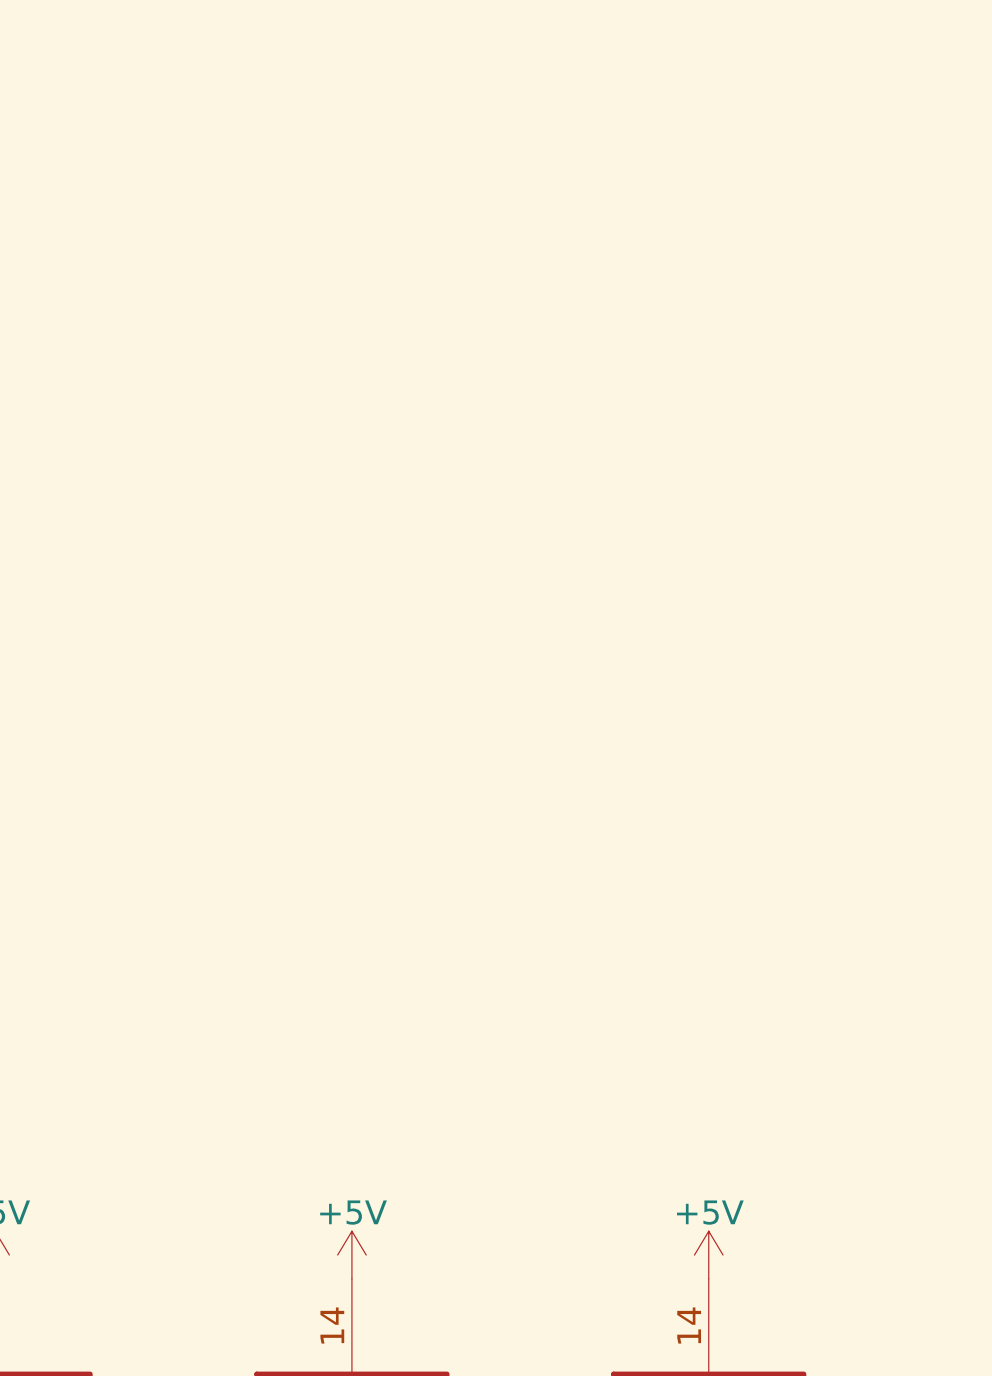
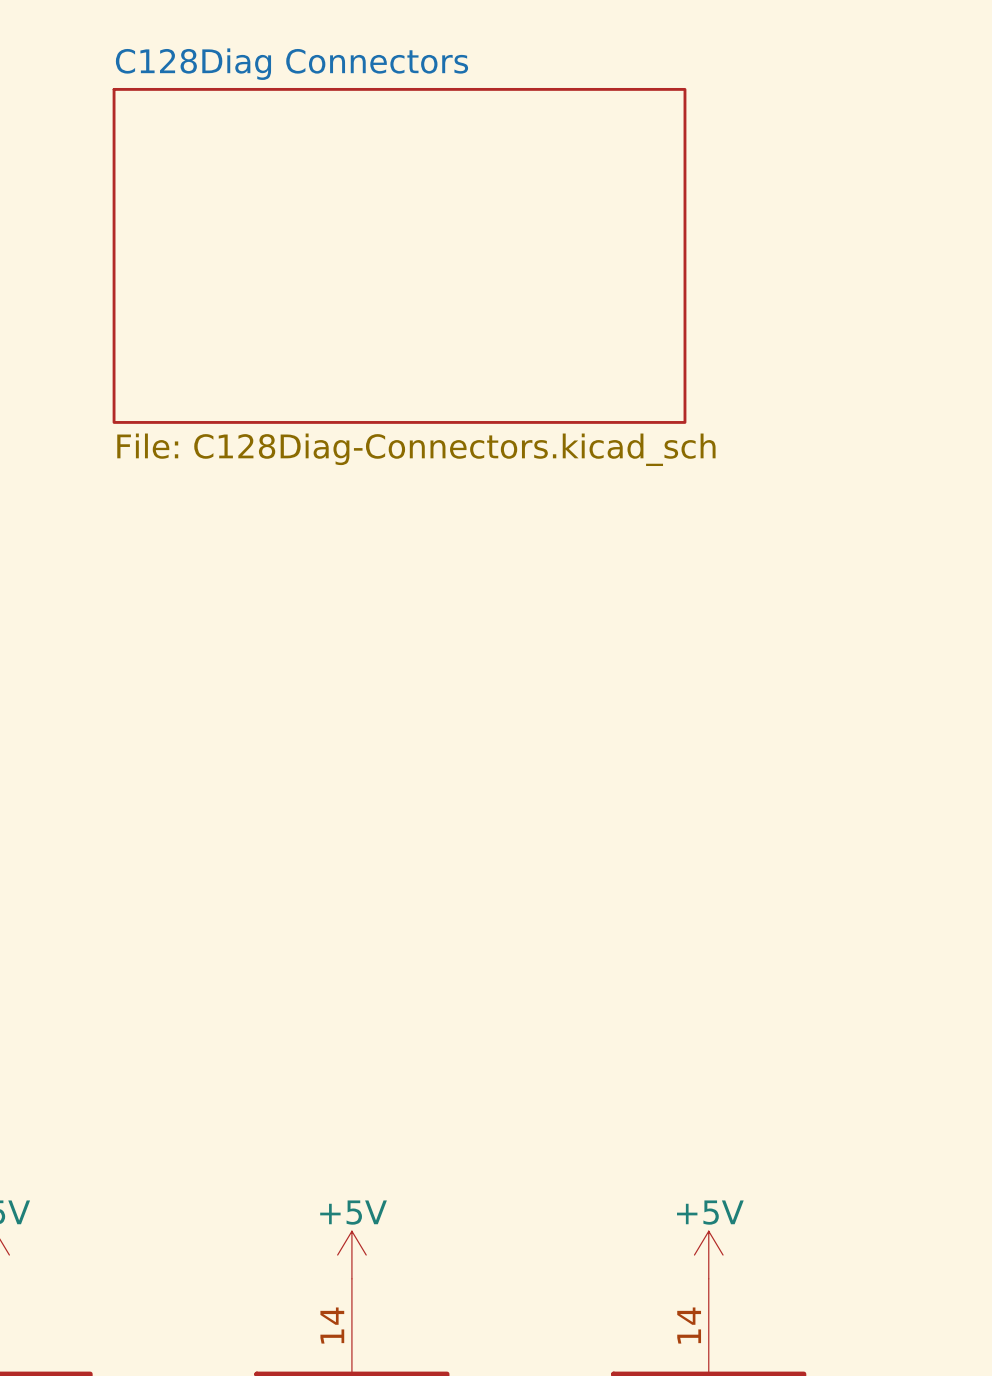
sheet C128Diag Connectors: none -> File: C128Diag-Connectors.kicad_sch (399, 255)

